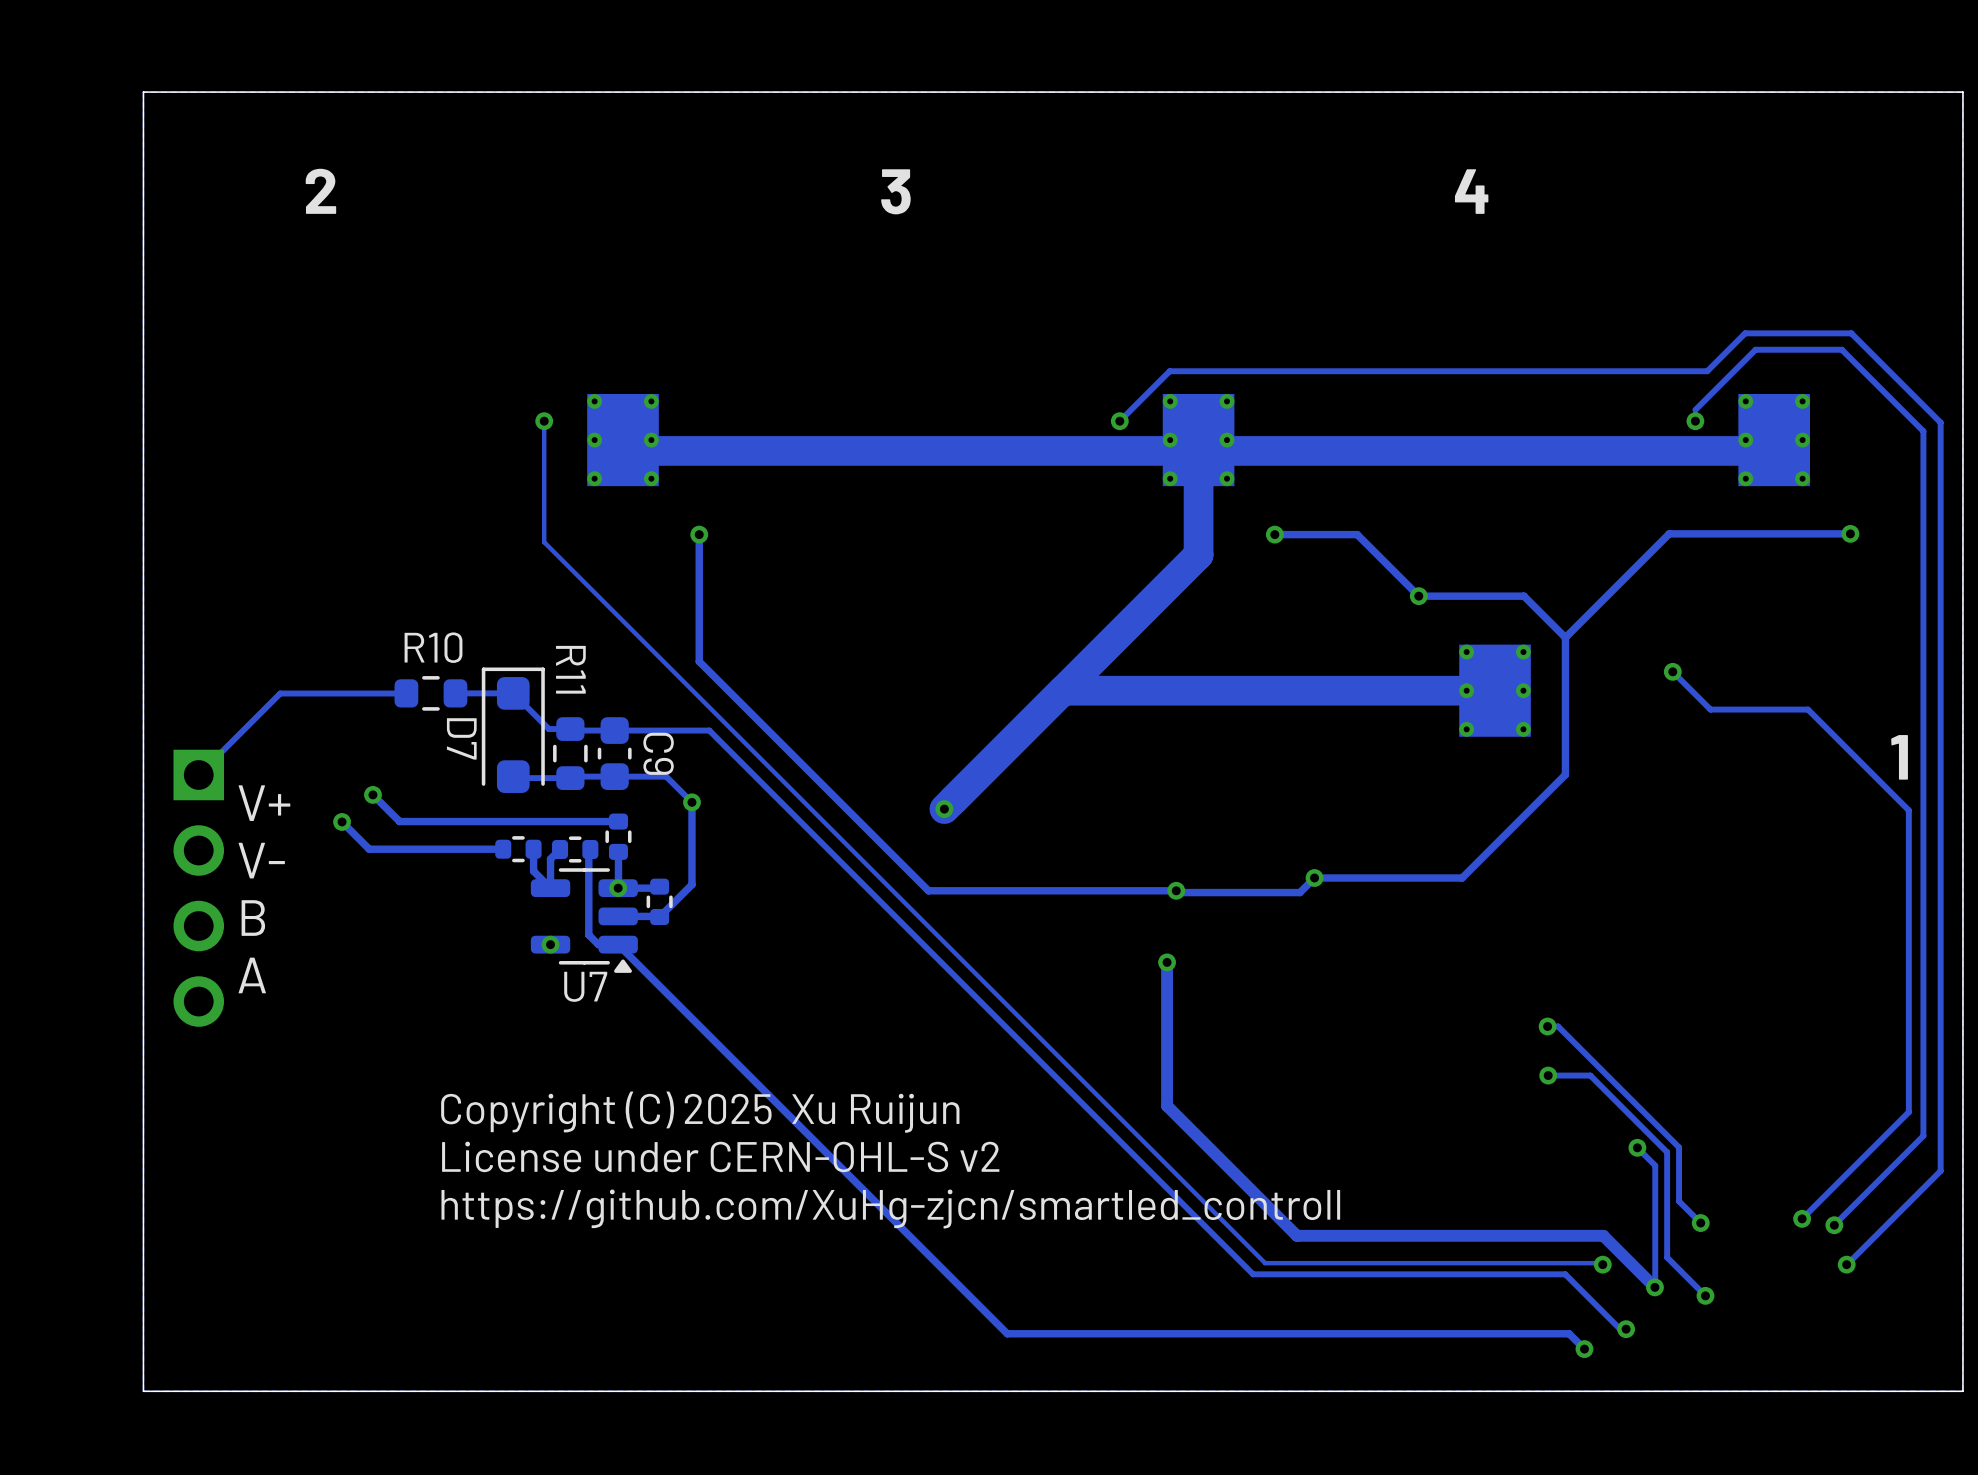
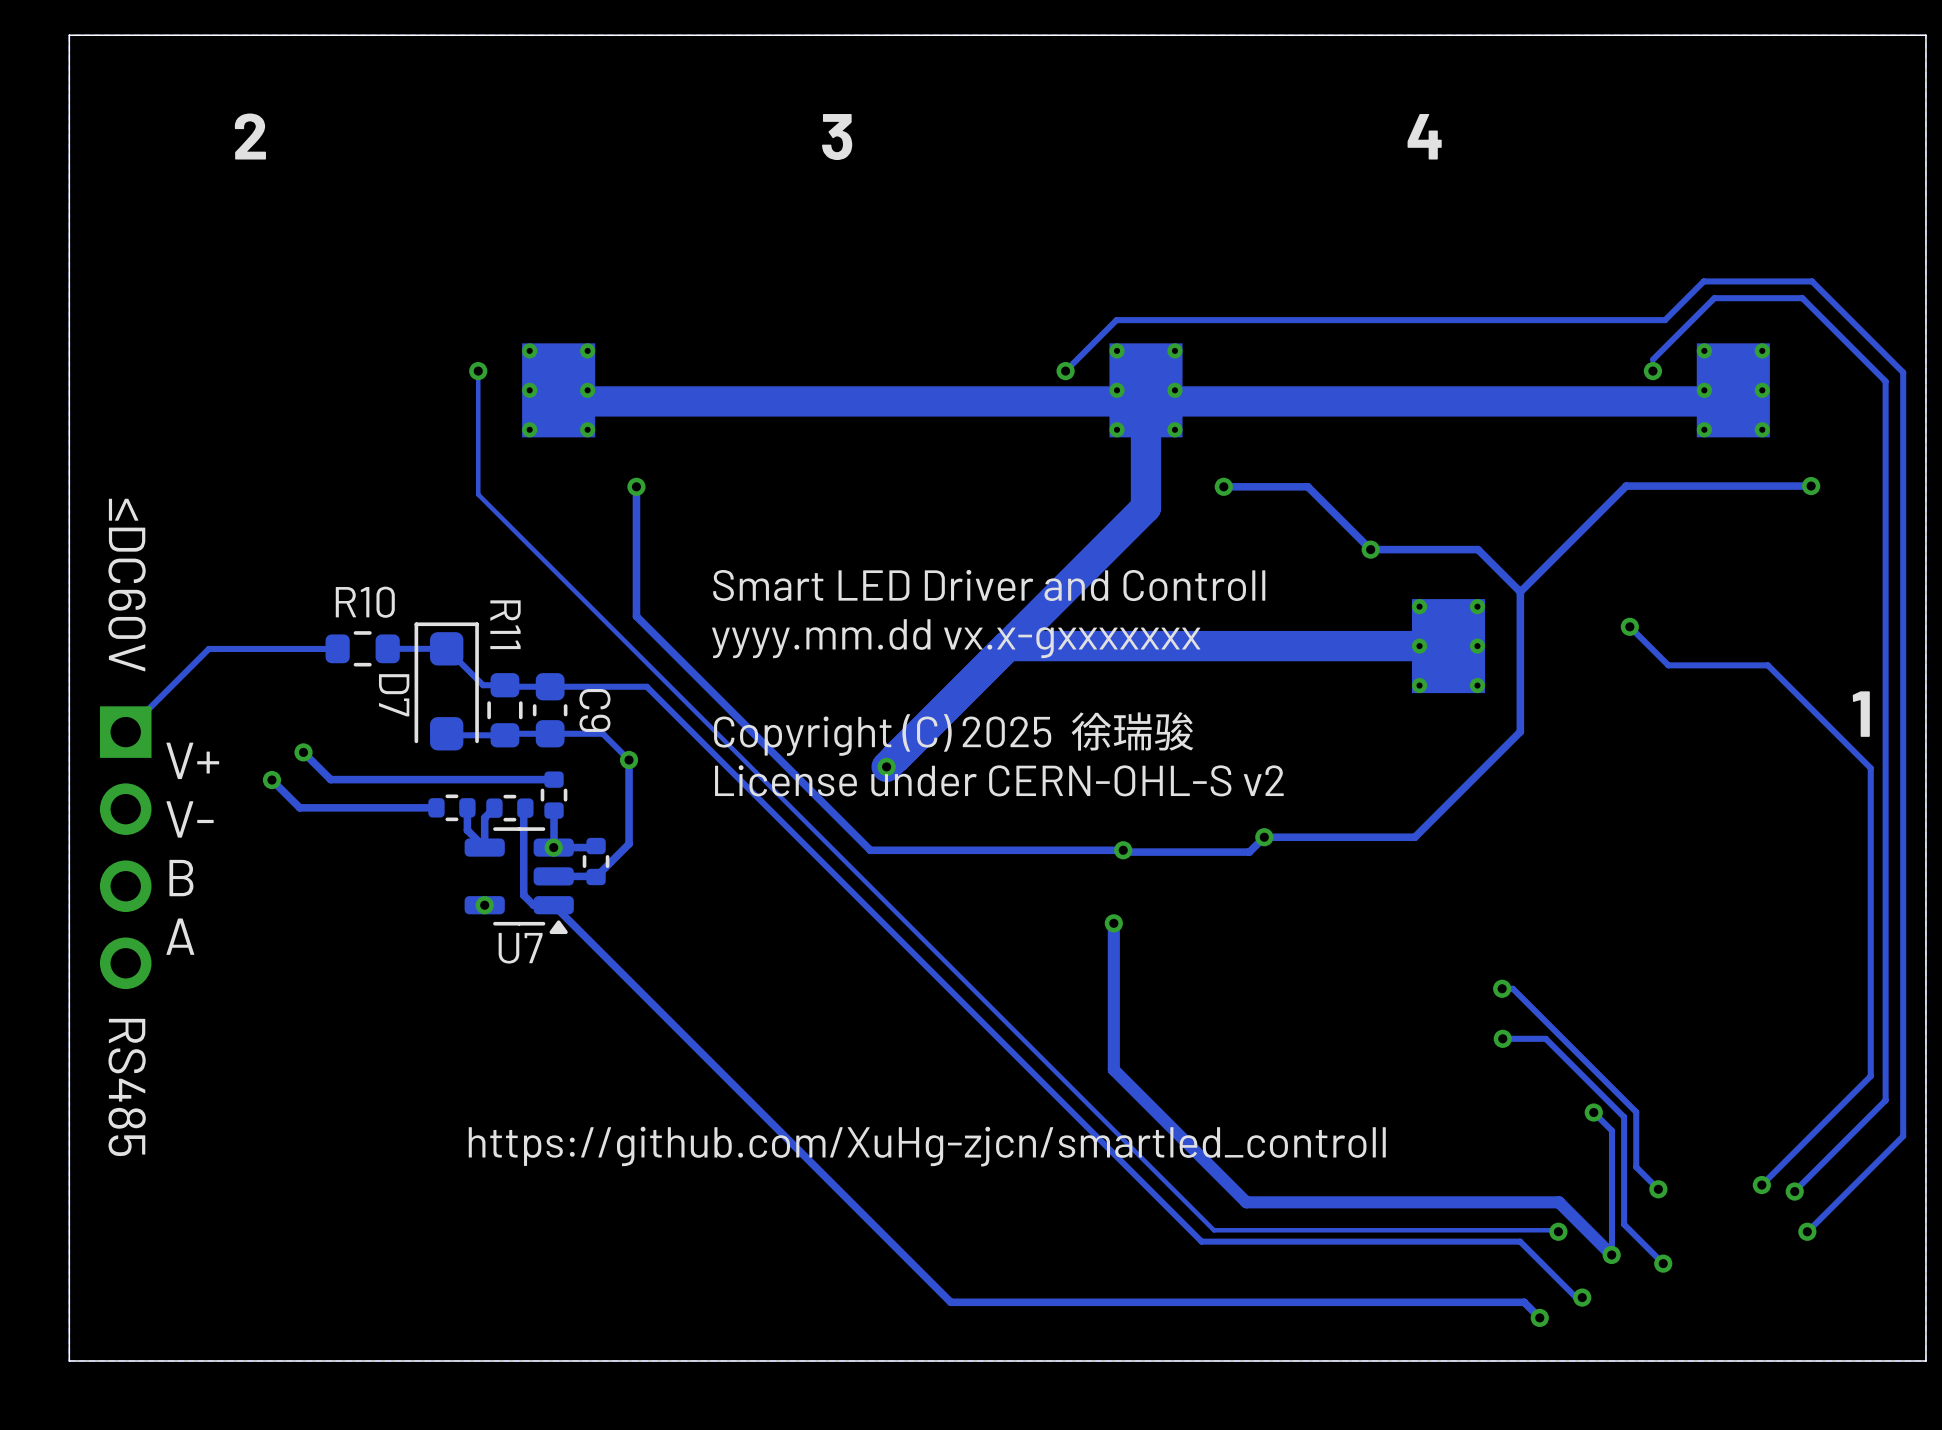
text: none -> ≤DC60V (127, 585)
text: none -> Smart LED Driver and Controll (989, 585)
text: none -> yyyy.mm.dd vx.x-gxxxxxxx (956, 638)
text: none -> Copyright (C) 2025 徐瑞骏 (953, 733)
text: Copyright (C) 2025 Xu Ruijun (700, 1112) -> none
text: none -> RS485 (127, 1087)
text position: License under CERN-OHL-S v2 (720, 1156) -> License under CERN-OHL-S v2 (999, 780)
text position: https://github.com/XuHg-zjcn/smartled_controll (890, 1209) -> https://github.com/XuHg-zjcn/smartled_controll (927, 1146)

